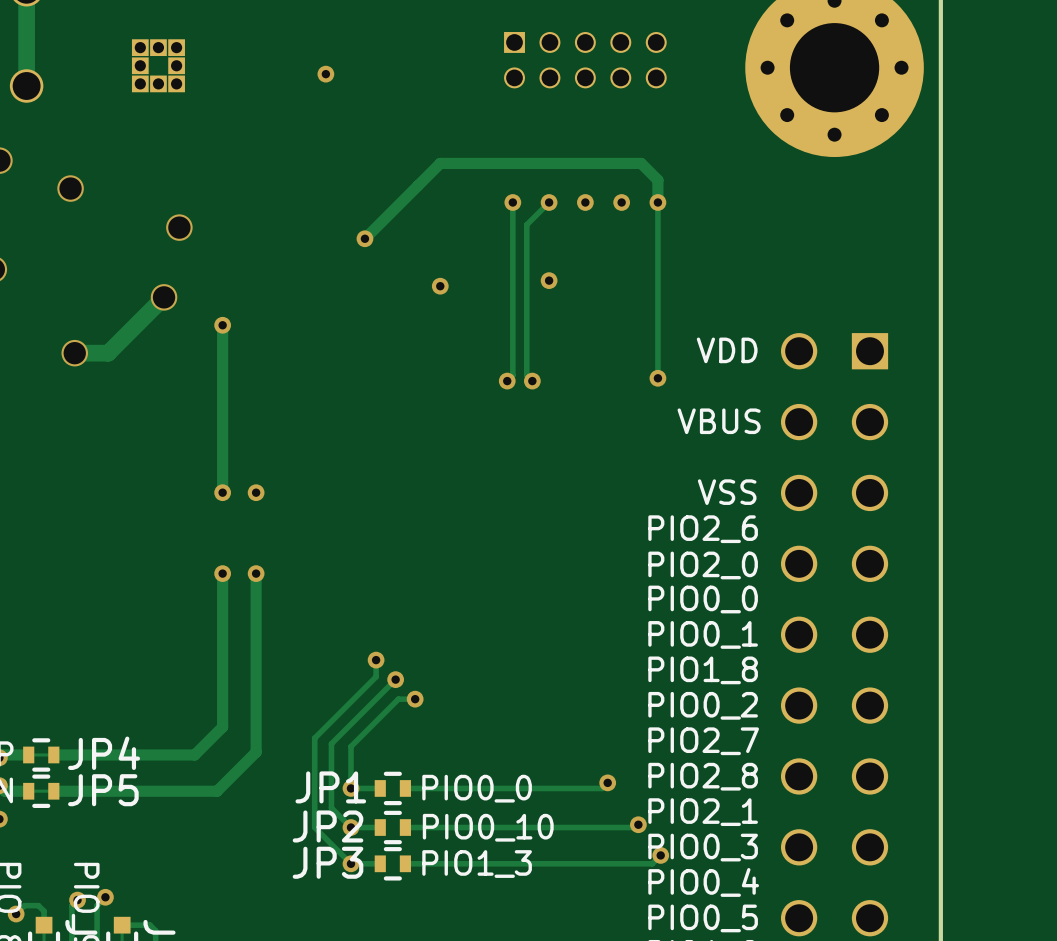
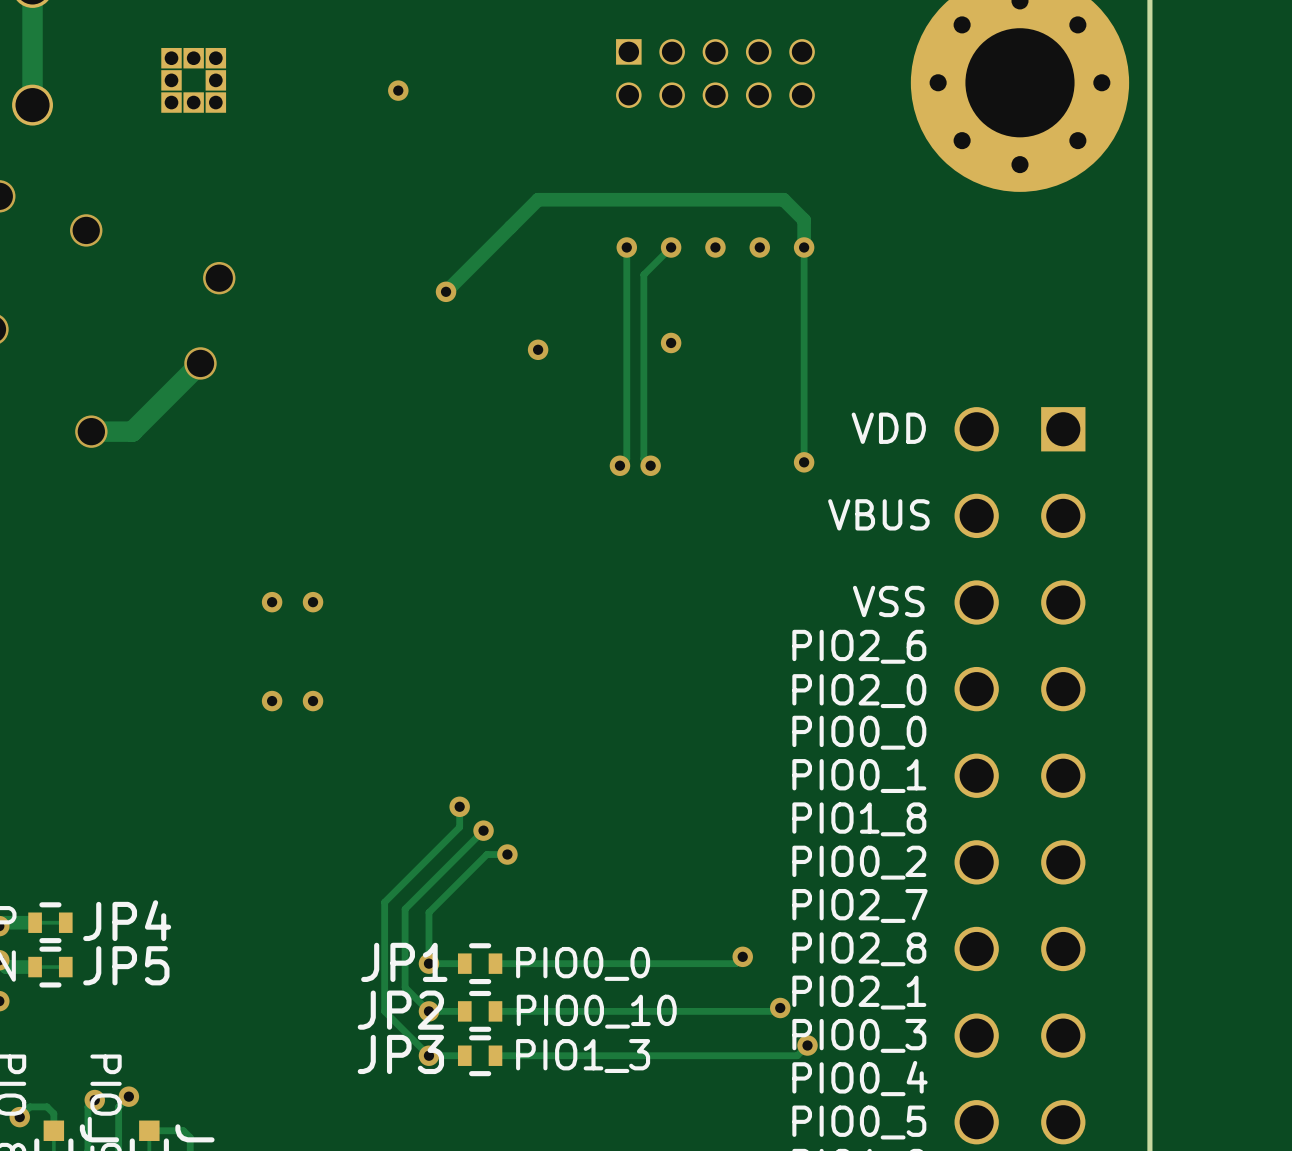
track: (222, 325) (222, 492) -> none
via: (222, 325) -> none
track: (222, 573) (222, 727) (194, 754) (53, 754) -> none
track: (256, 573) (256, 752) (217, 791) (53, 791) -> none

